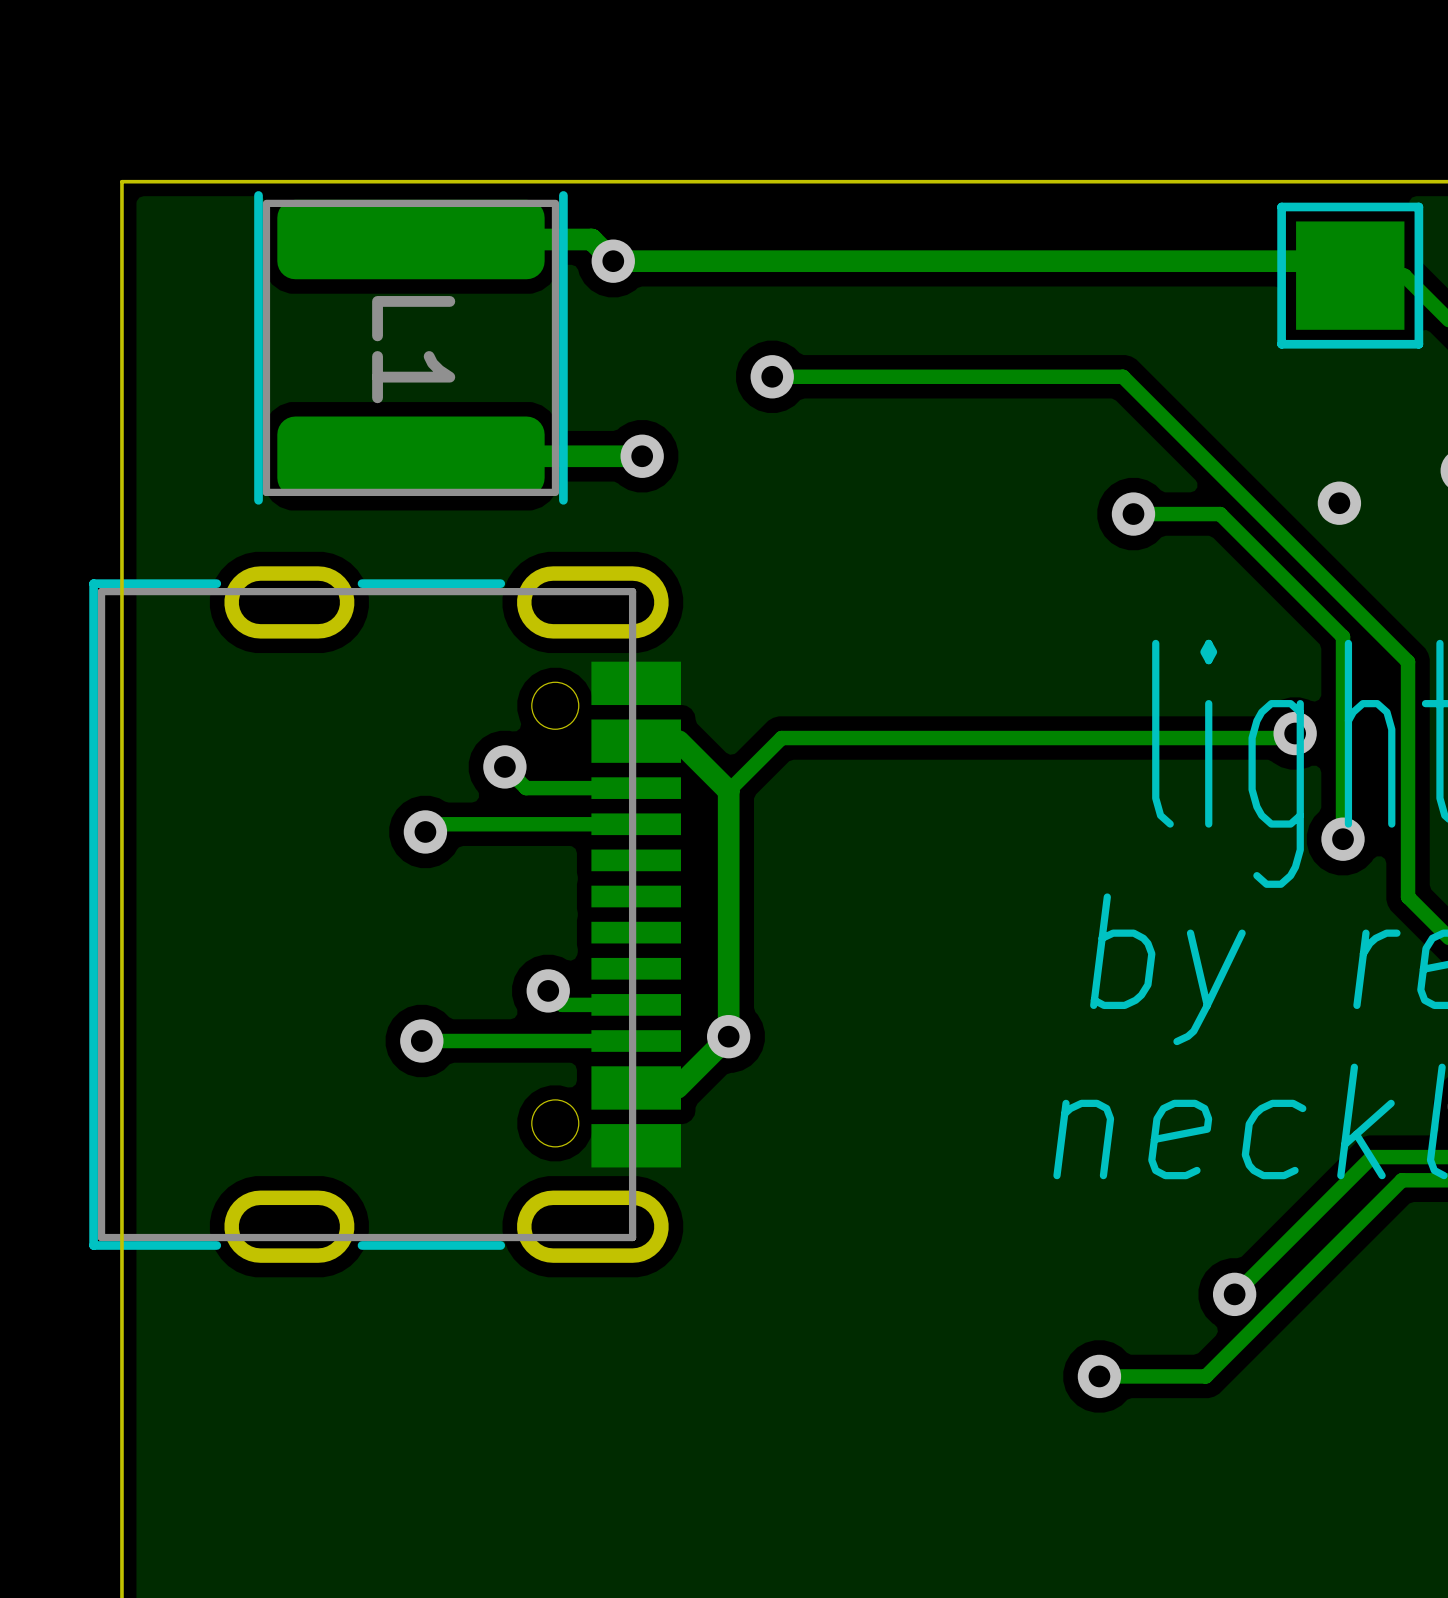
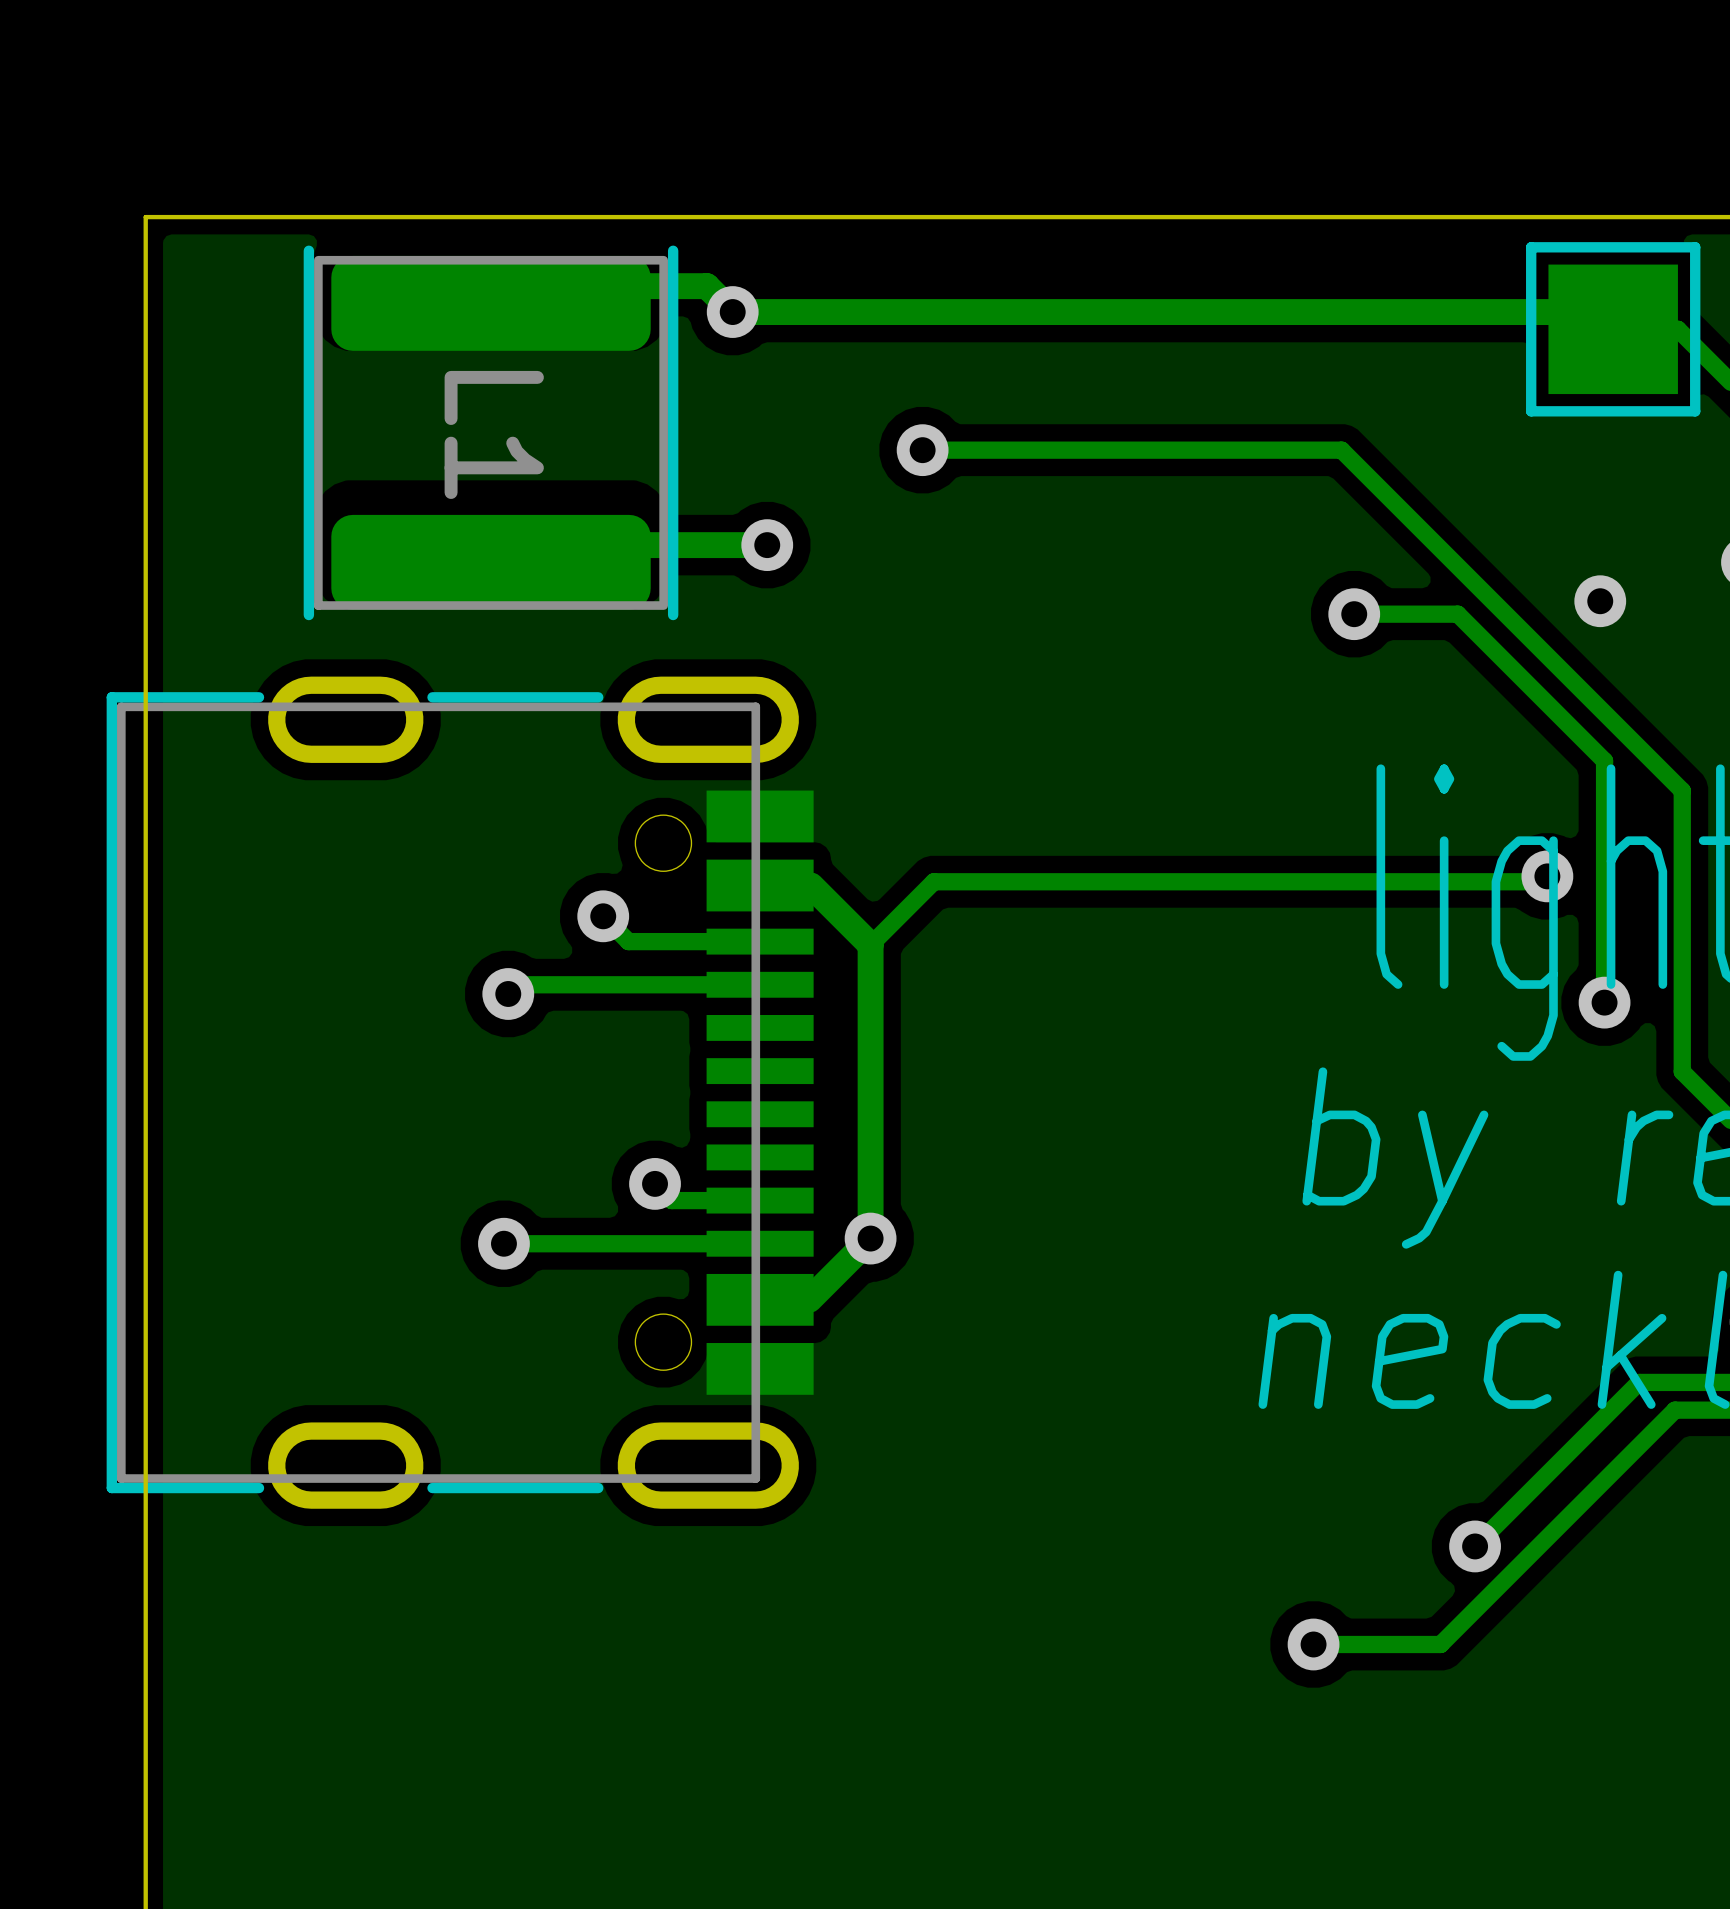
L1 position: (410, 347) -> (491, 432)

